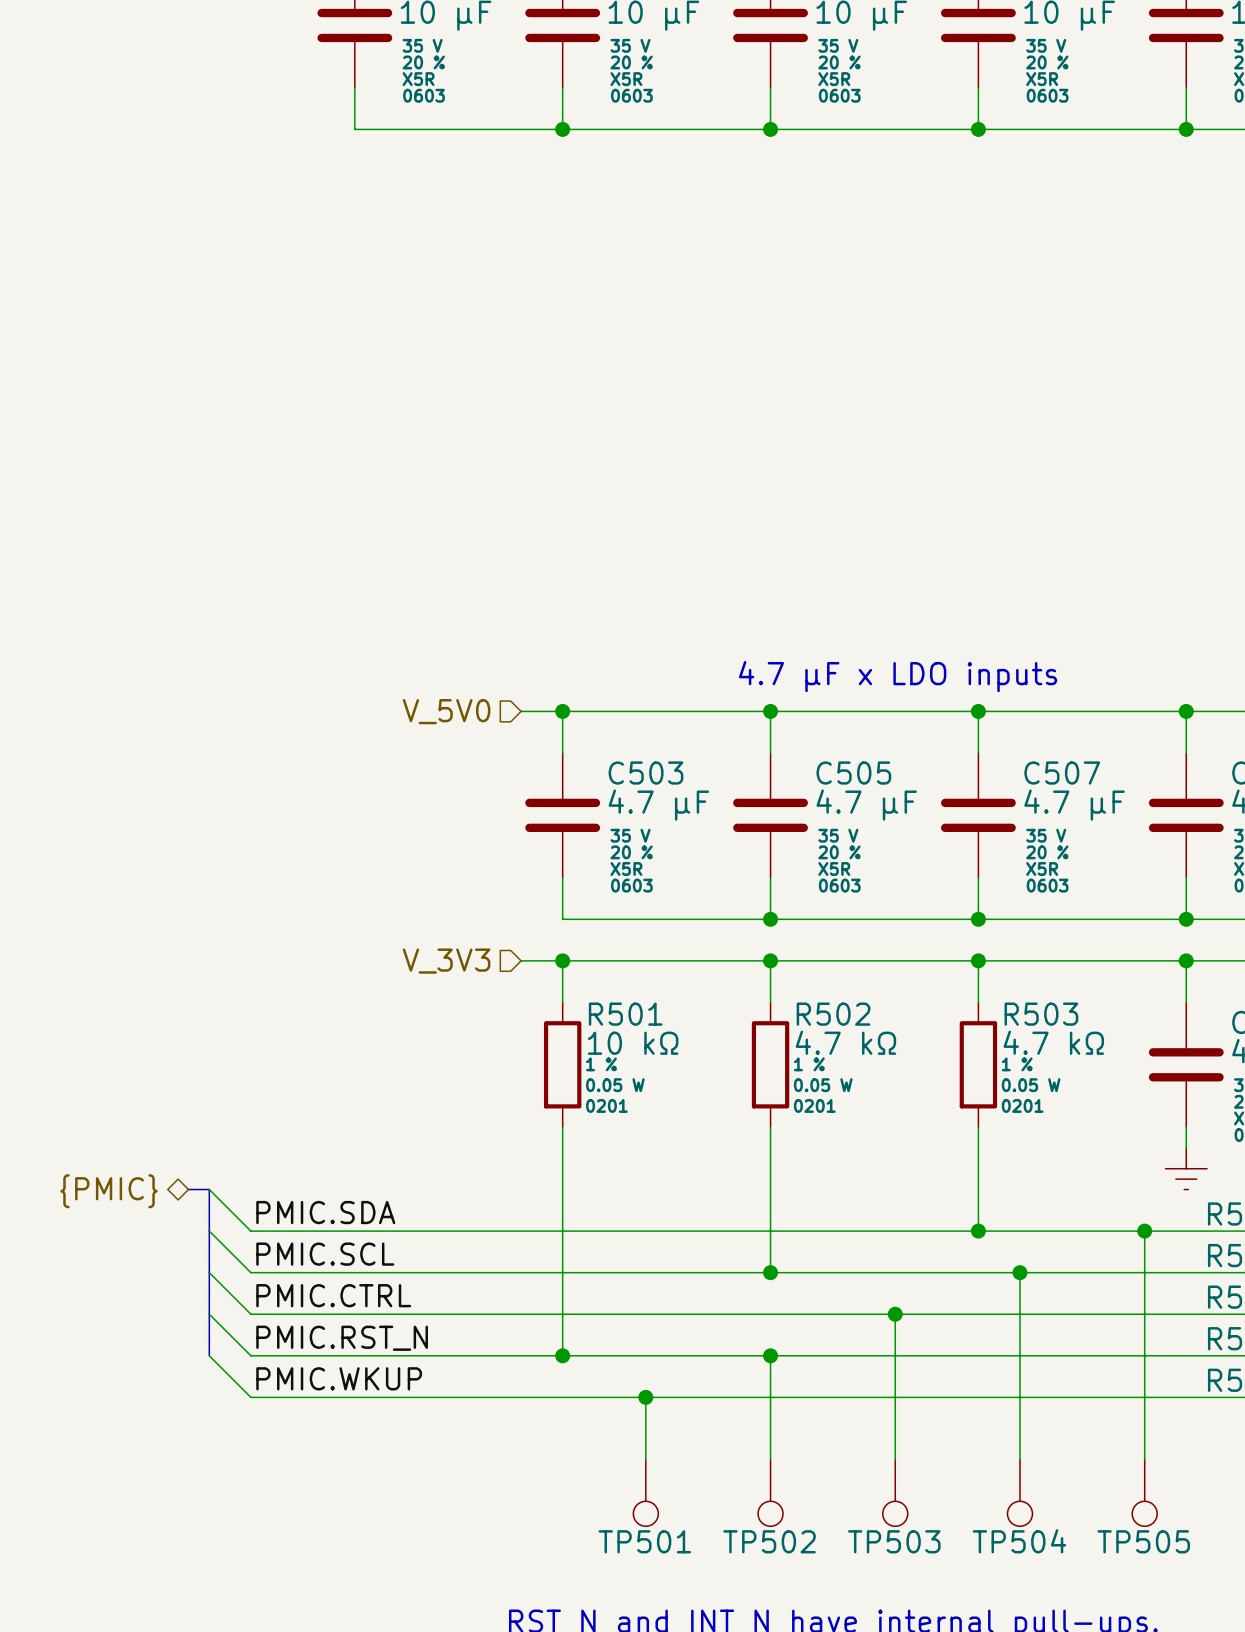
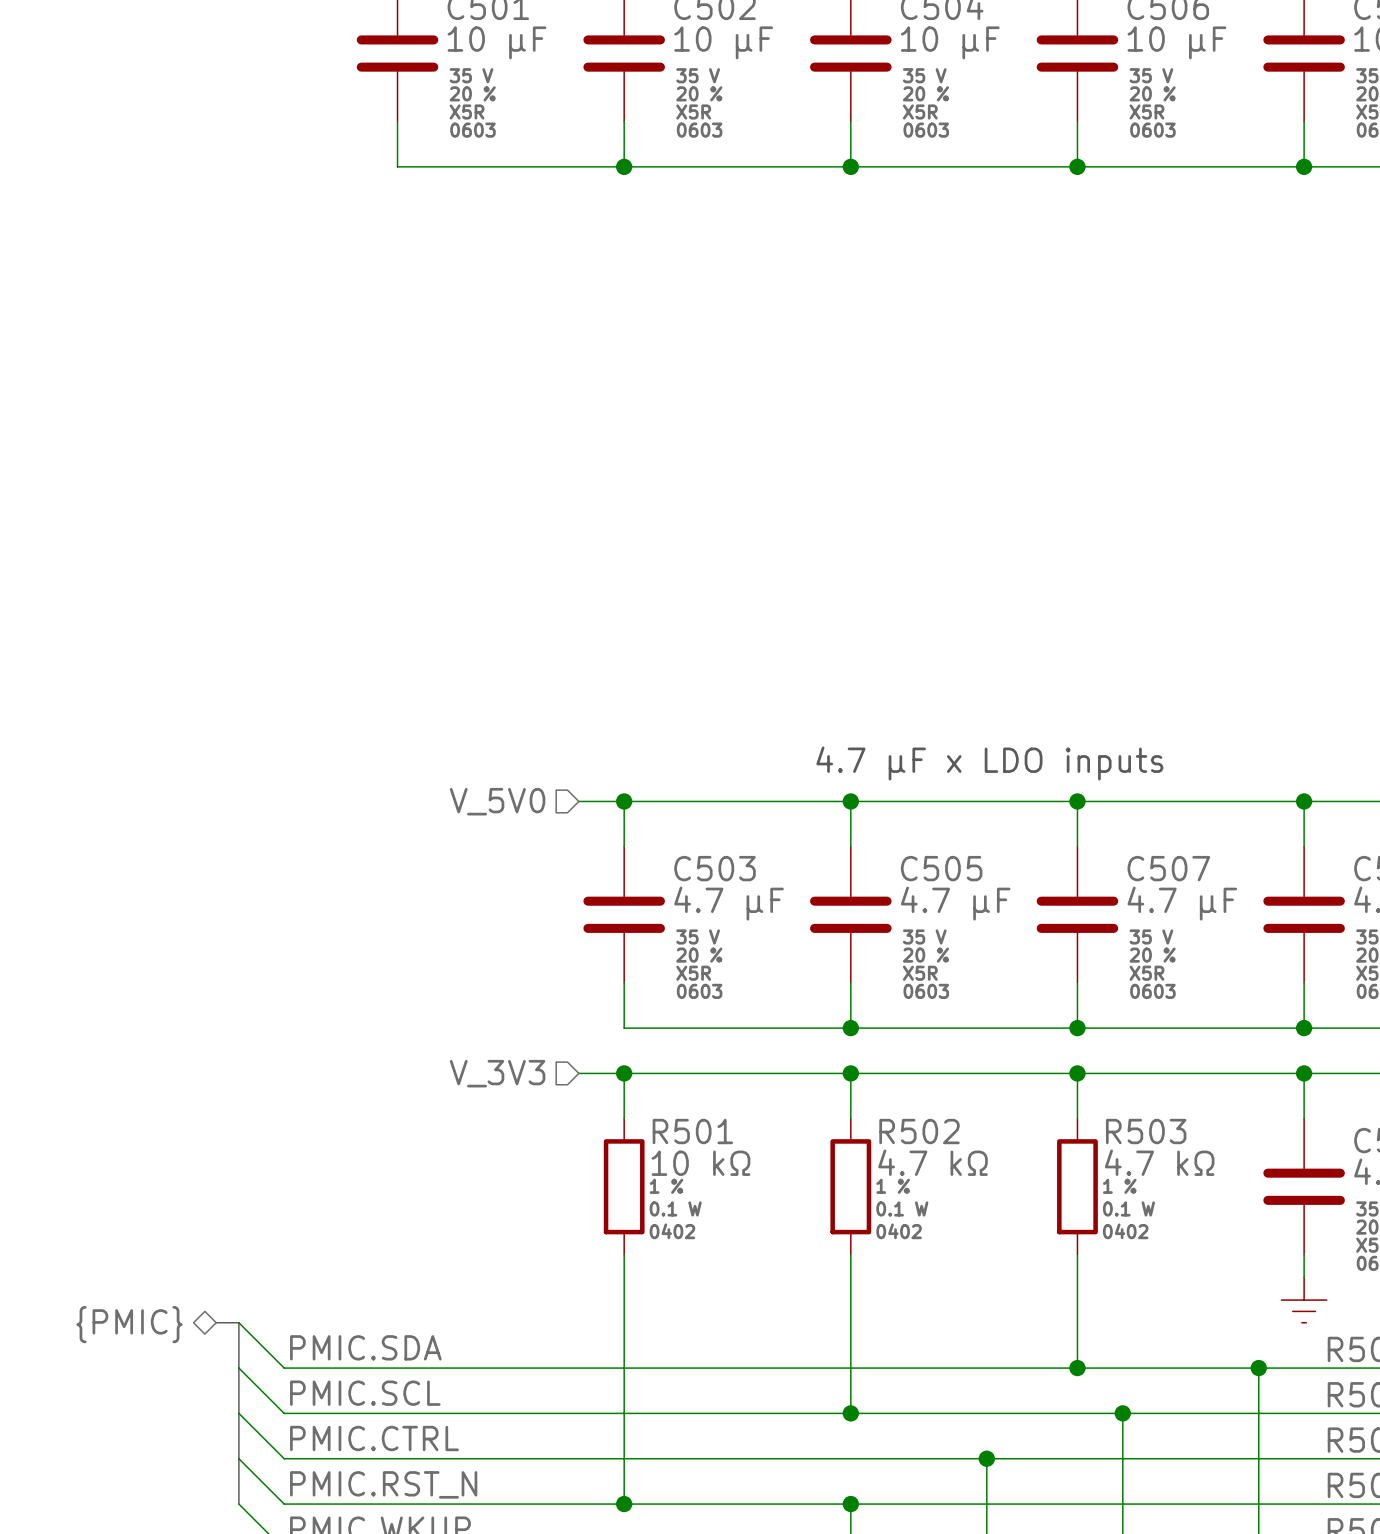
R501 text: 0.05 W (615, 1085) -> 0.1 W (675, 1208)
R502 text: 0.05 W (823, 1085) -> 0.1 W (902, 1208)
R503 text: 0.05 W (1031, 1085) -> 0.1 W (1128, 1208)
R501 text: 0201 (606, 1105) -> 0402 (672, 1231)
R502 text: 0201 (814, 1105) -> 0402 (899, 1231)
R503 text: 0201 (1022, 1105) -> 0402 (1125, 1231)

